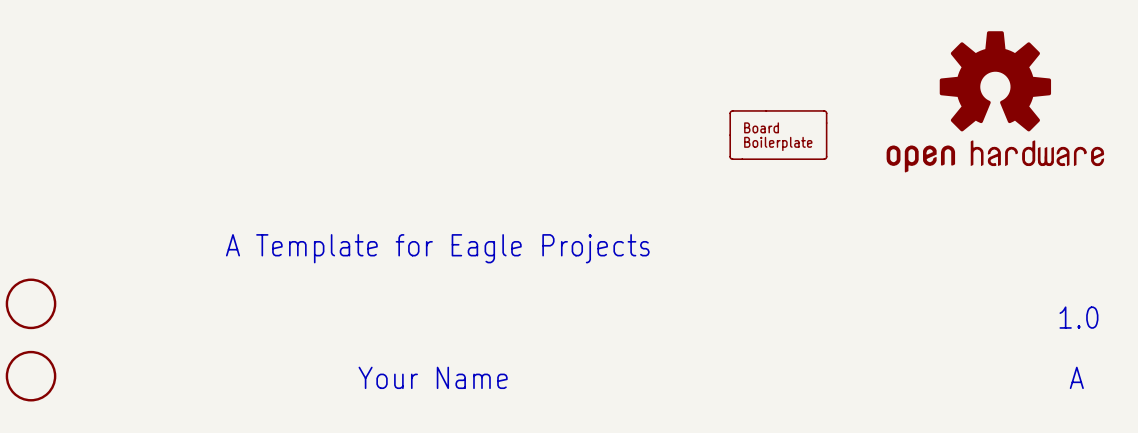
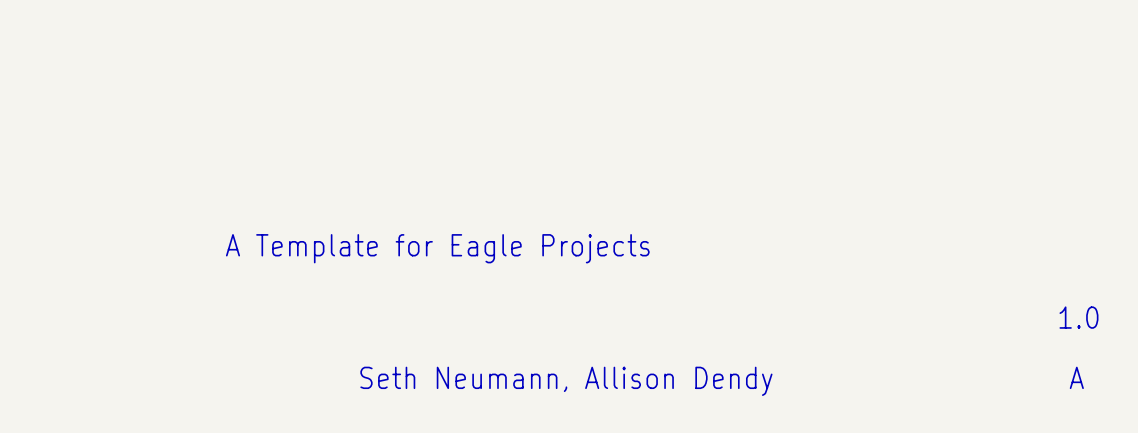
part: (995, 101) -> none
part: (778, 135) -> none
part: (31, 303) -> none
part: (31, 376) -> none
text: Your Name (433, 377) -> Seth Neumann, Allison Dendy (566, 381)

